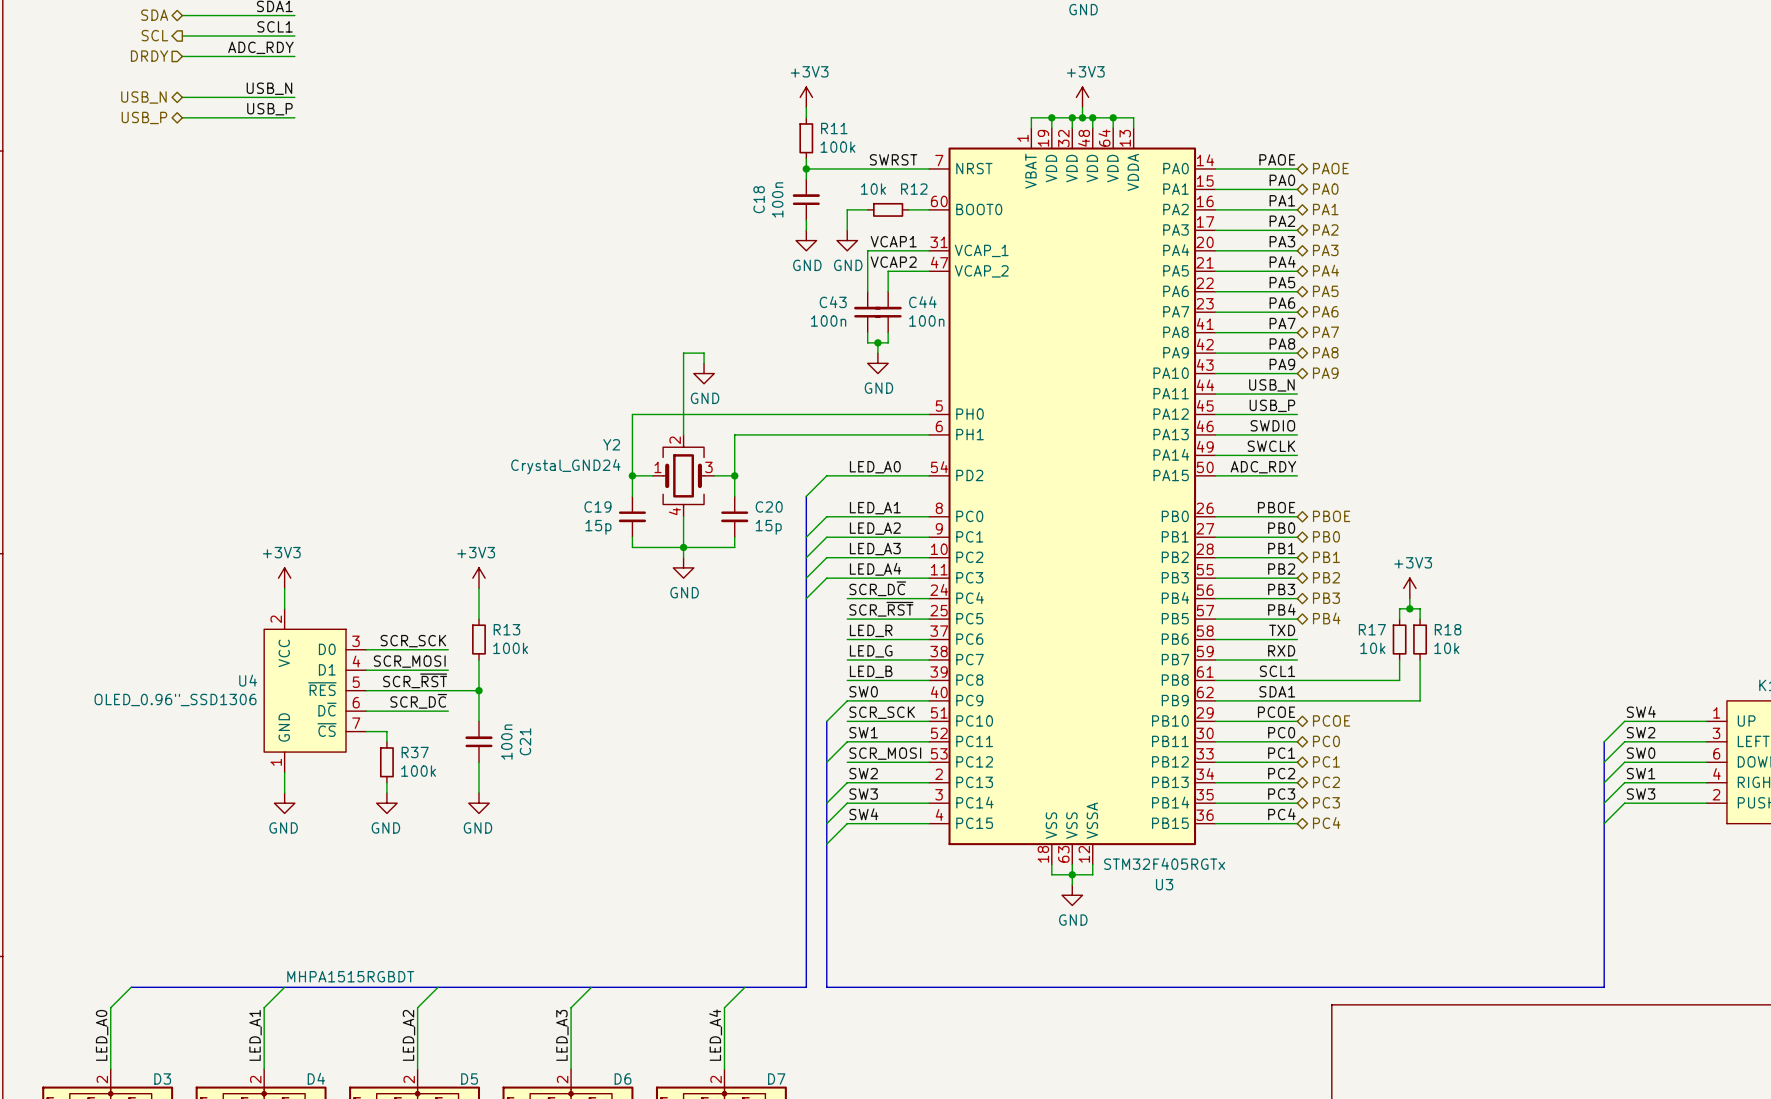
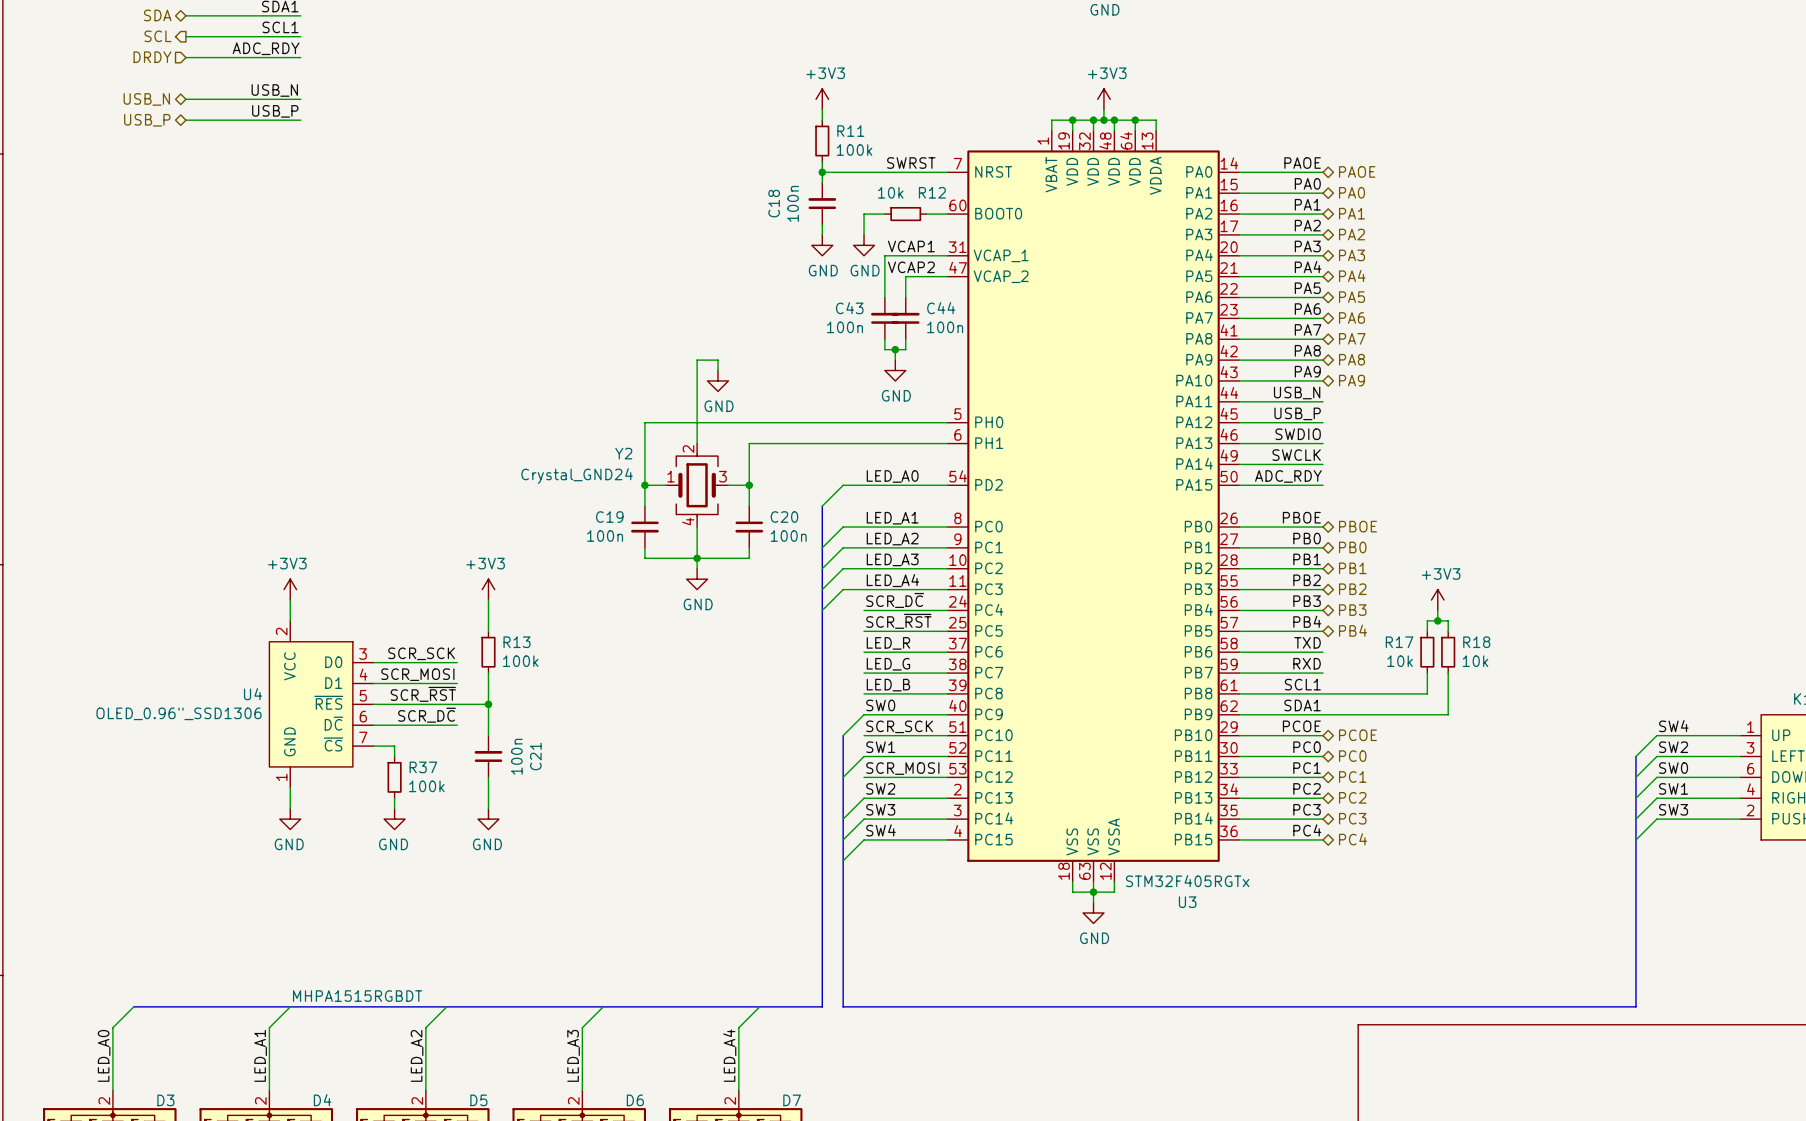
C19 value: 15p (598, 527) -> 100n (605, 536)
C20 value: 15p (768, 527) -> 100n (788, 536)

